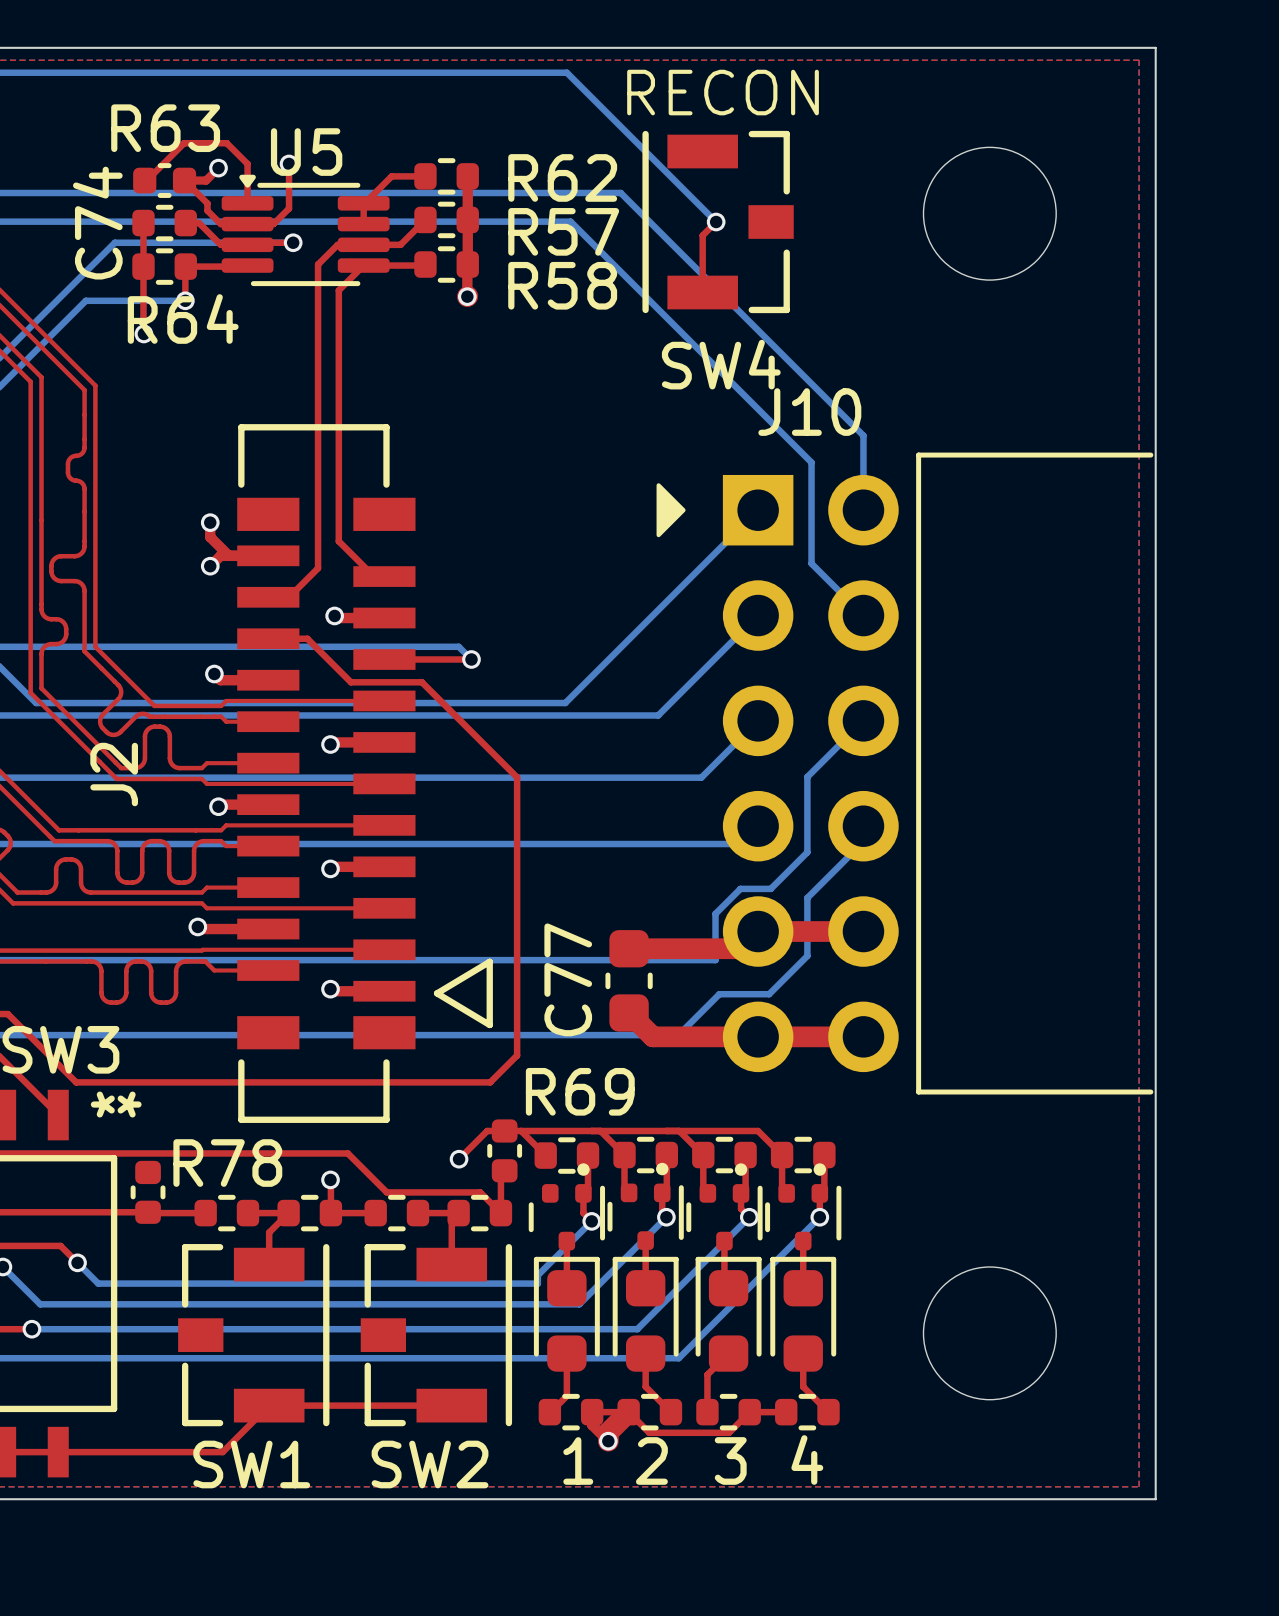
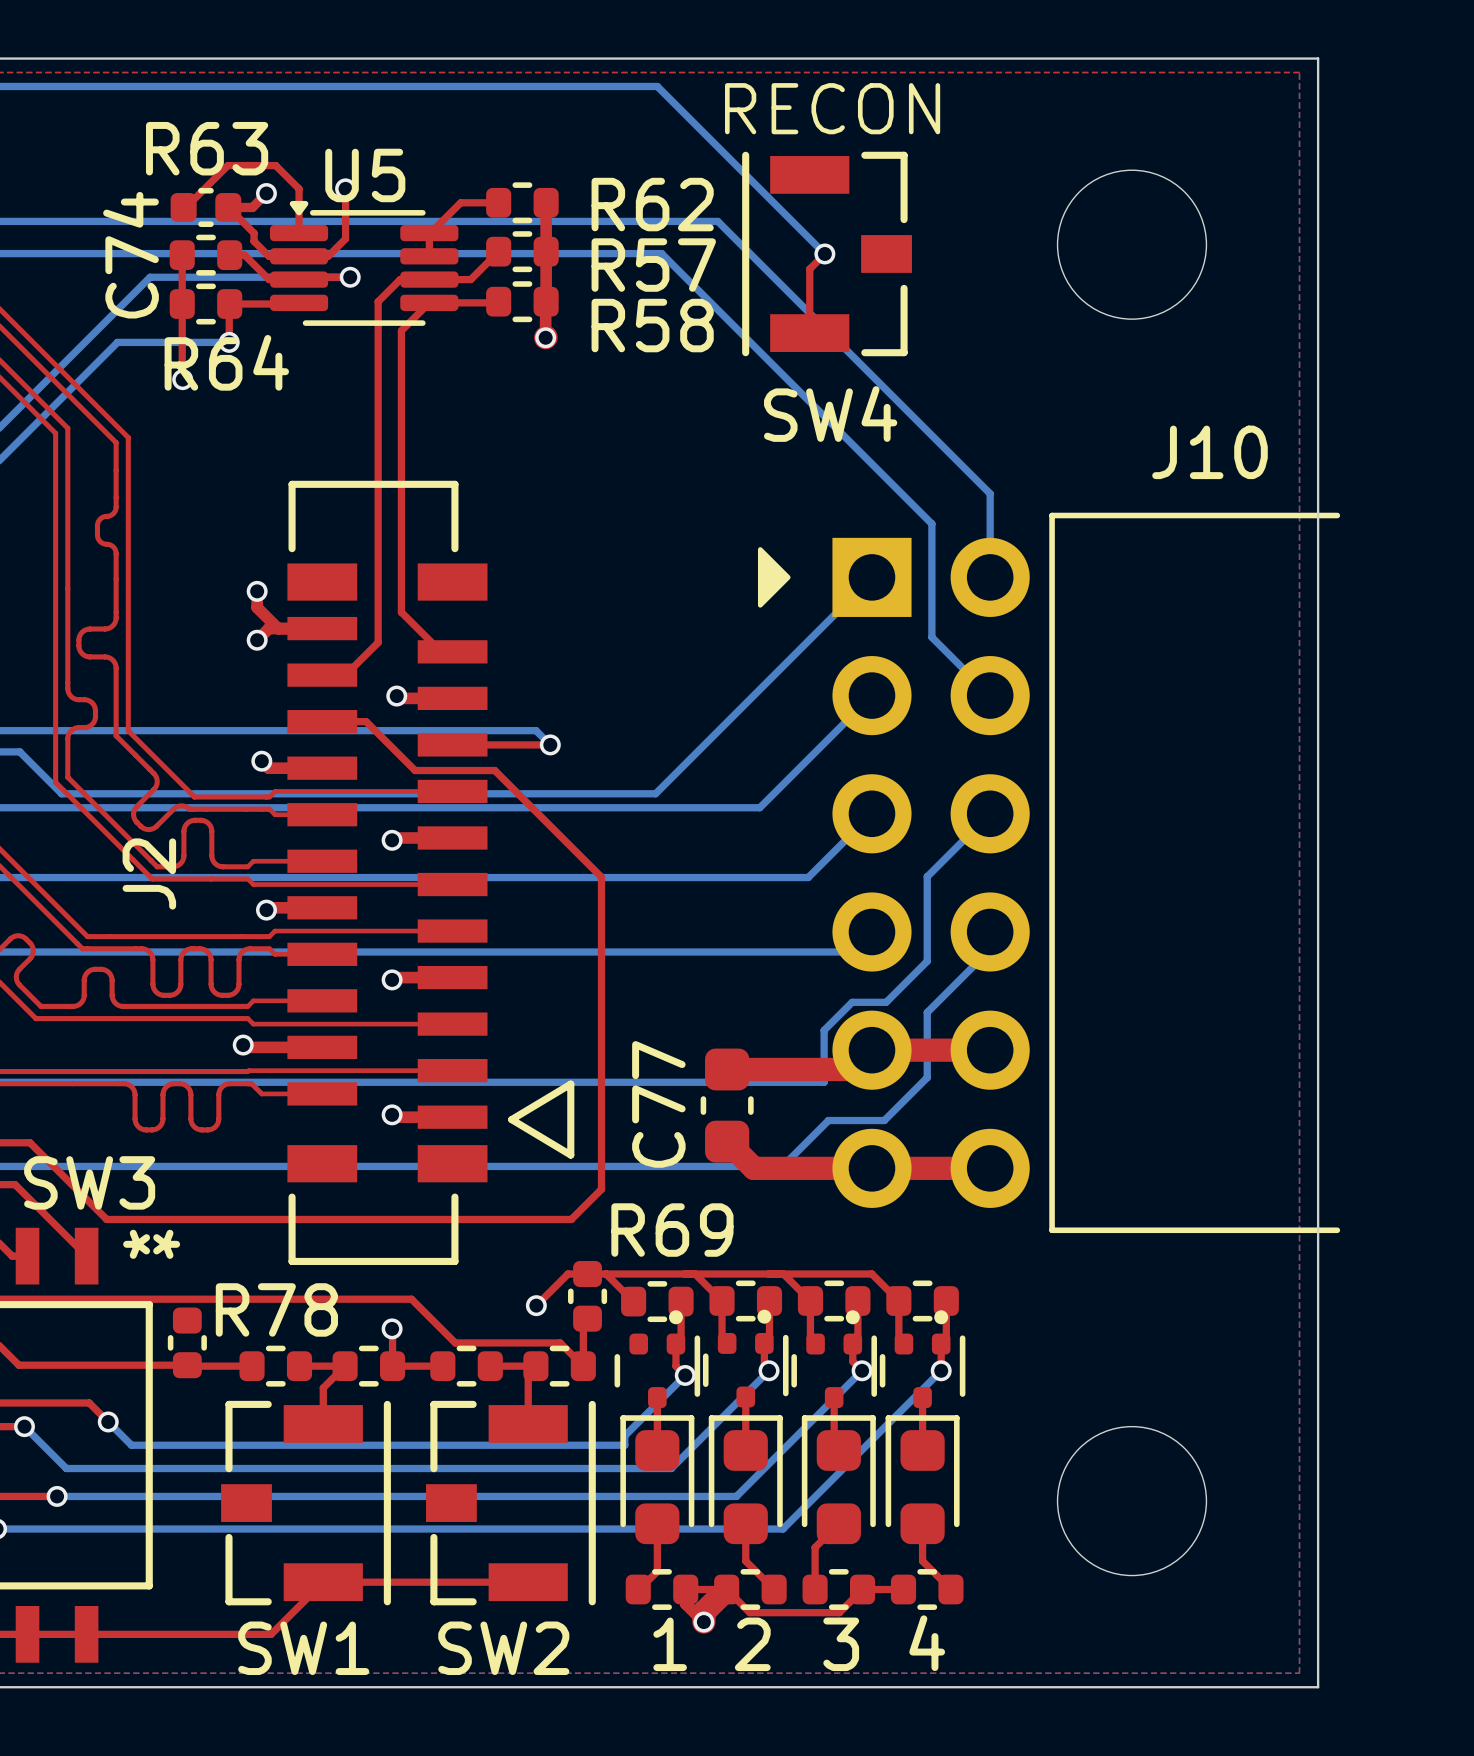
J10 name position: J10 (809, 412) -> J10 (1209, 452)
J10 footprint: [656, 452, 1154, 1095] -> [757, 512, 1341, 1234]

